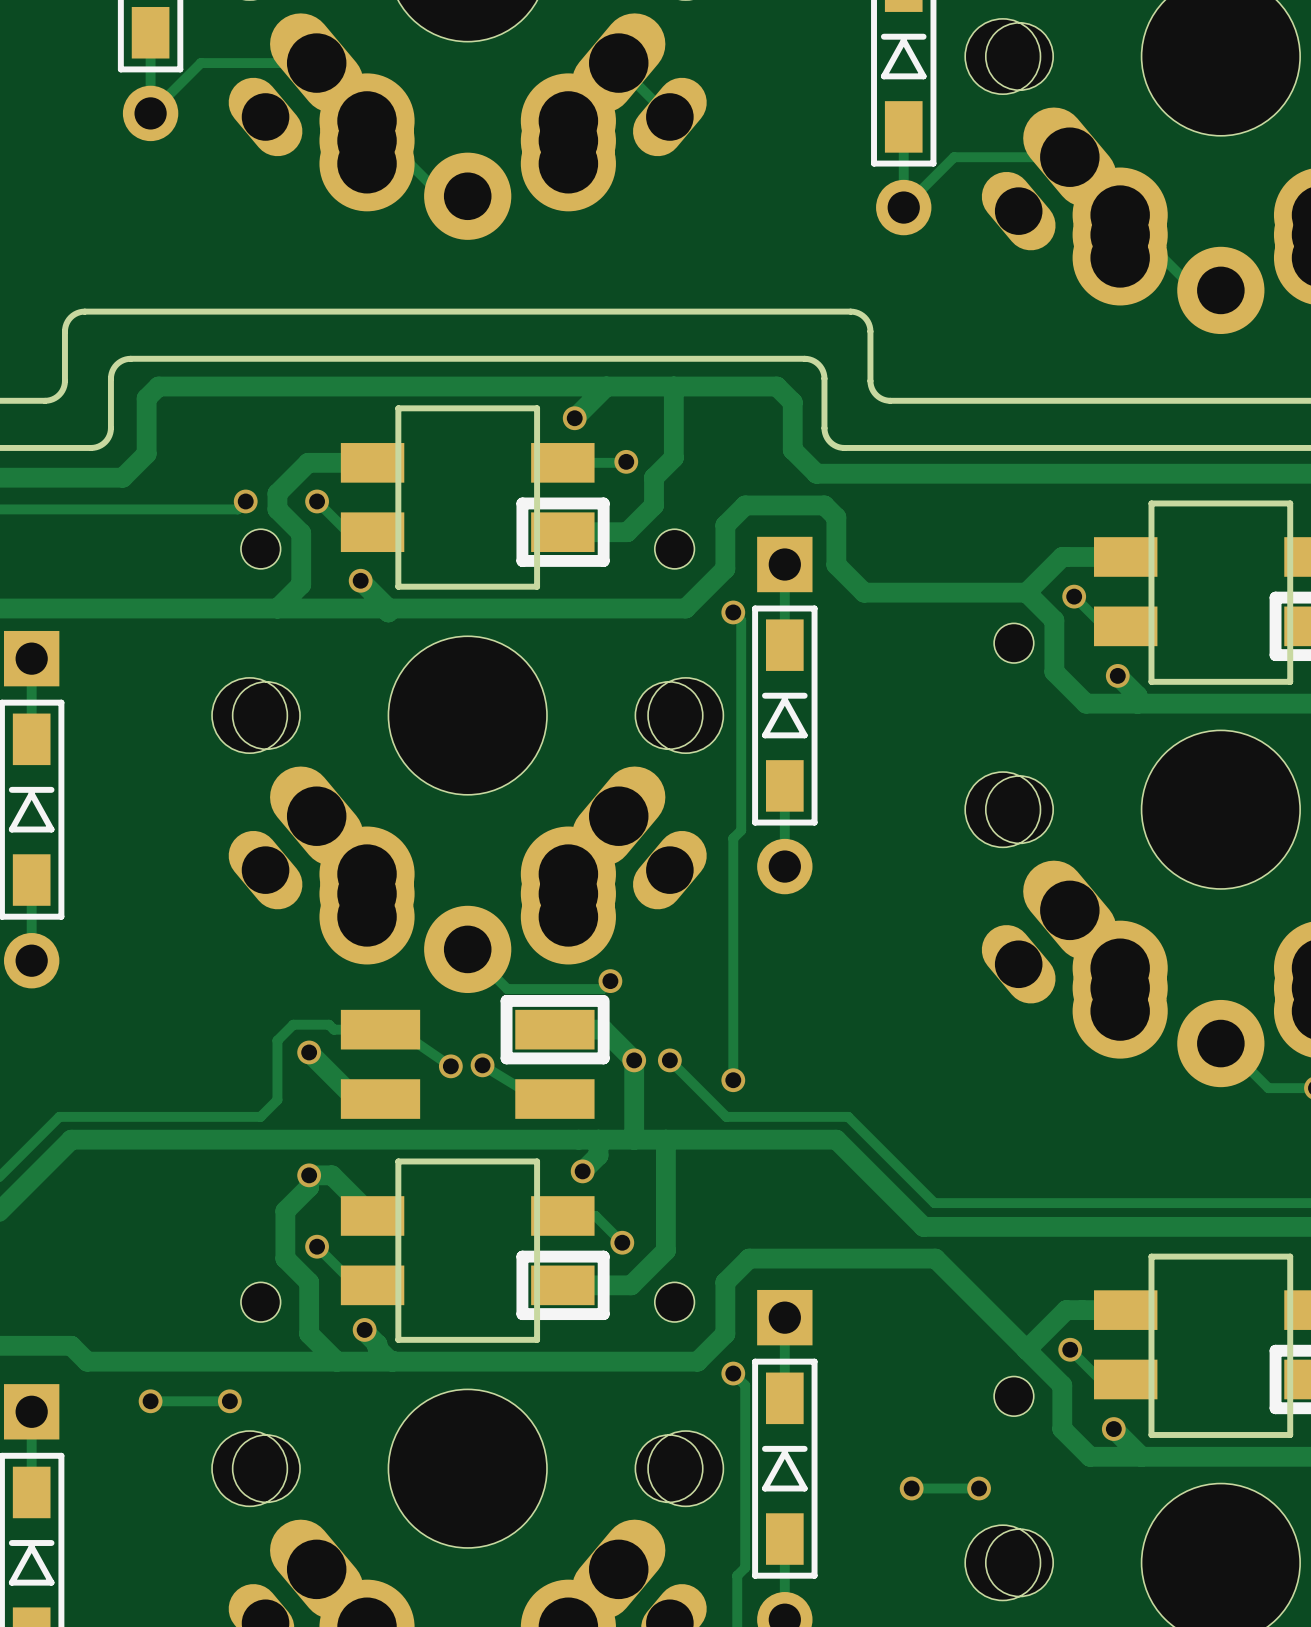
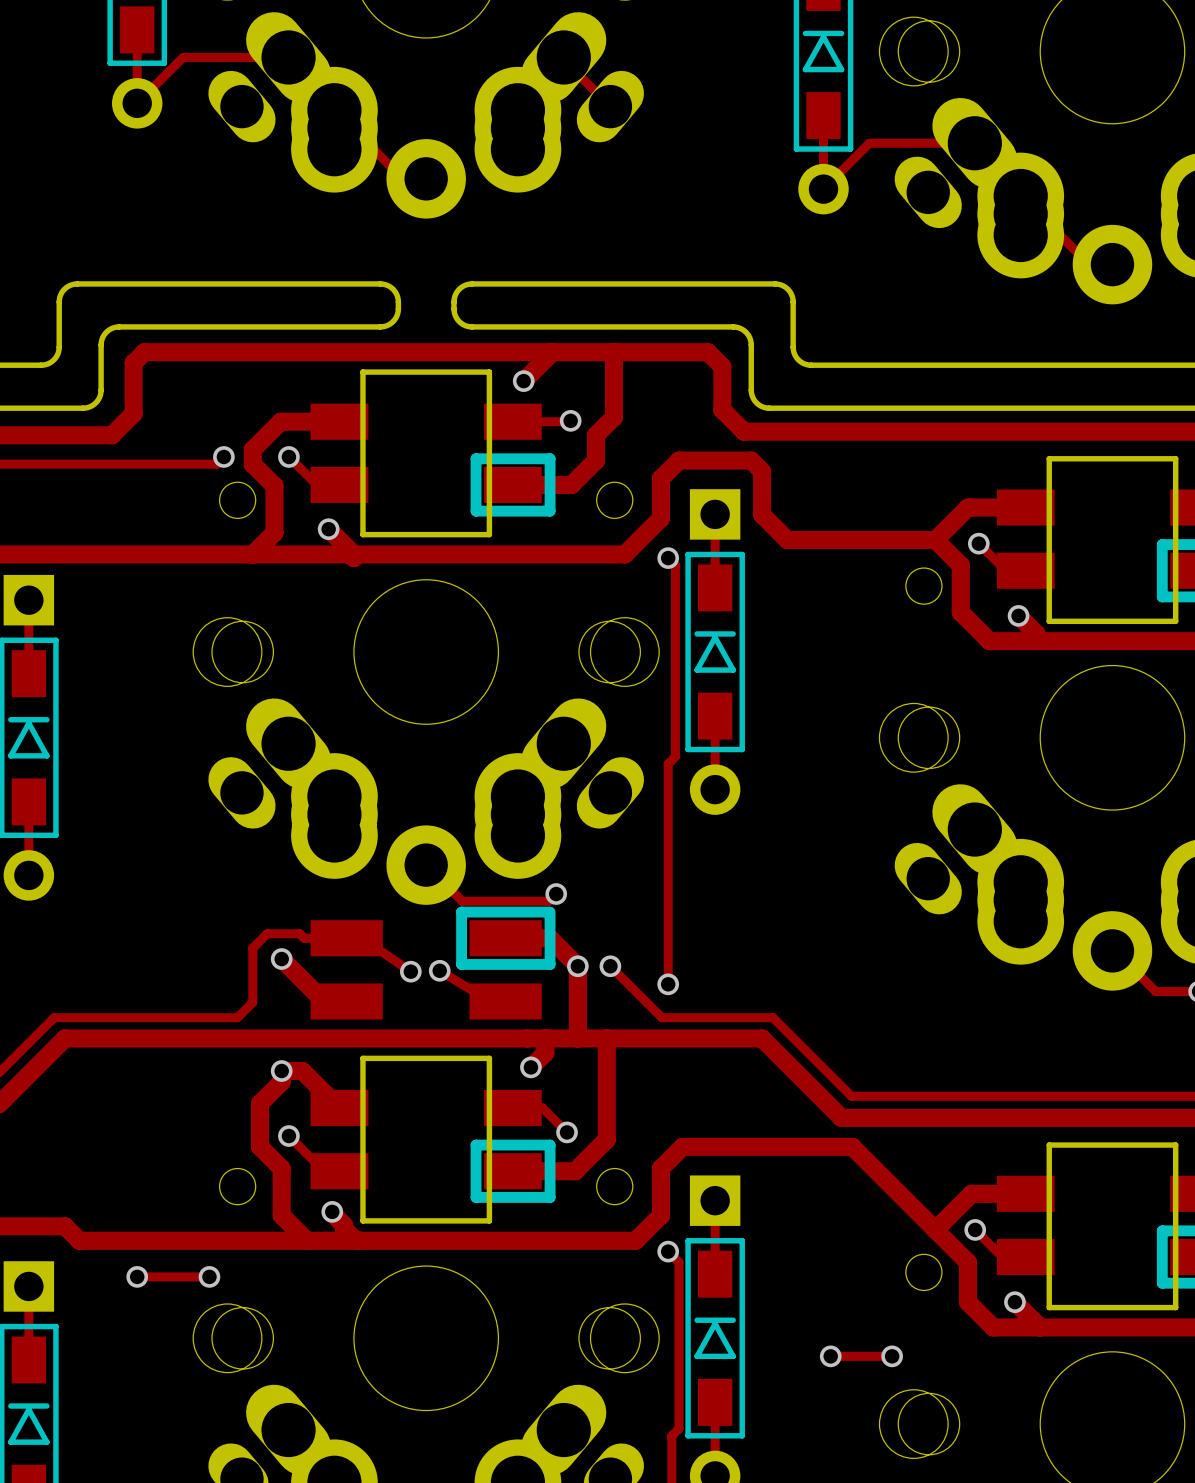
board edge: (417, 311) (518, 311) -> (380, 283) (393, 289) (398, 302) (397, 313) (394, 319) (387, 325) (380, 326)
board edge: (417, 358) (518, 358) -> (472, 283) (465, 285) (457, 291) (454, 297) (454, 308) (459, 321) (472, 326)

